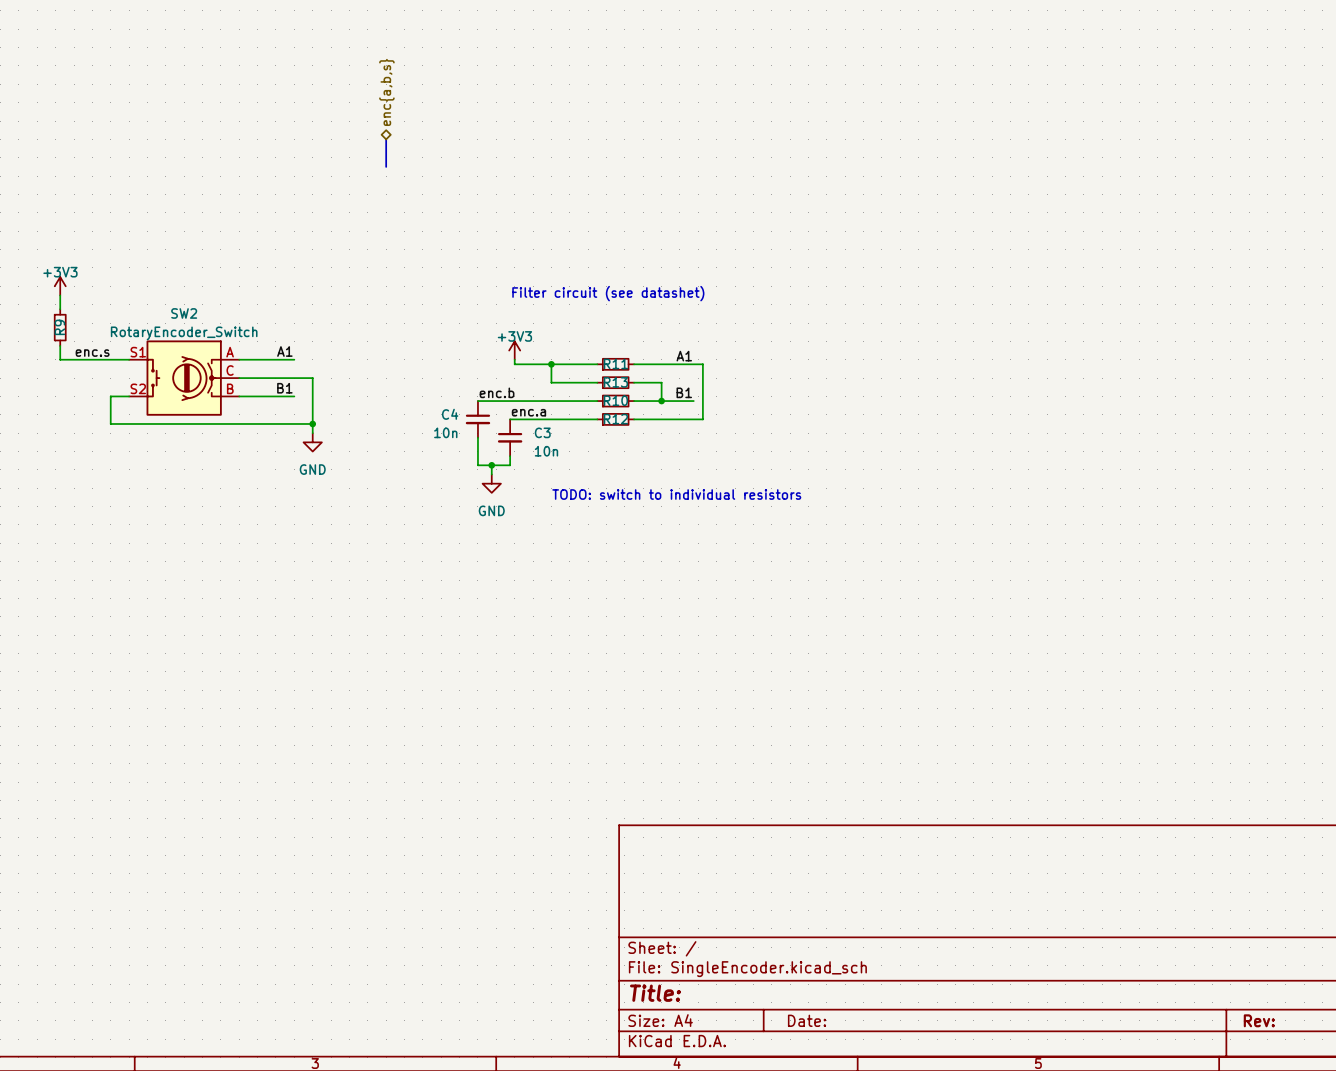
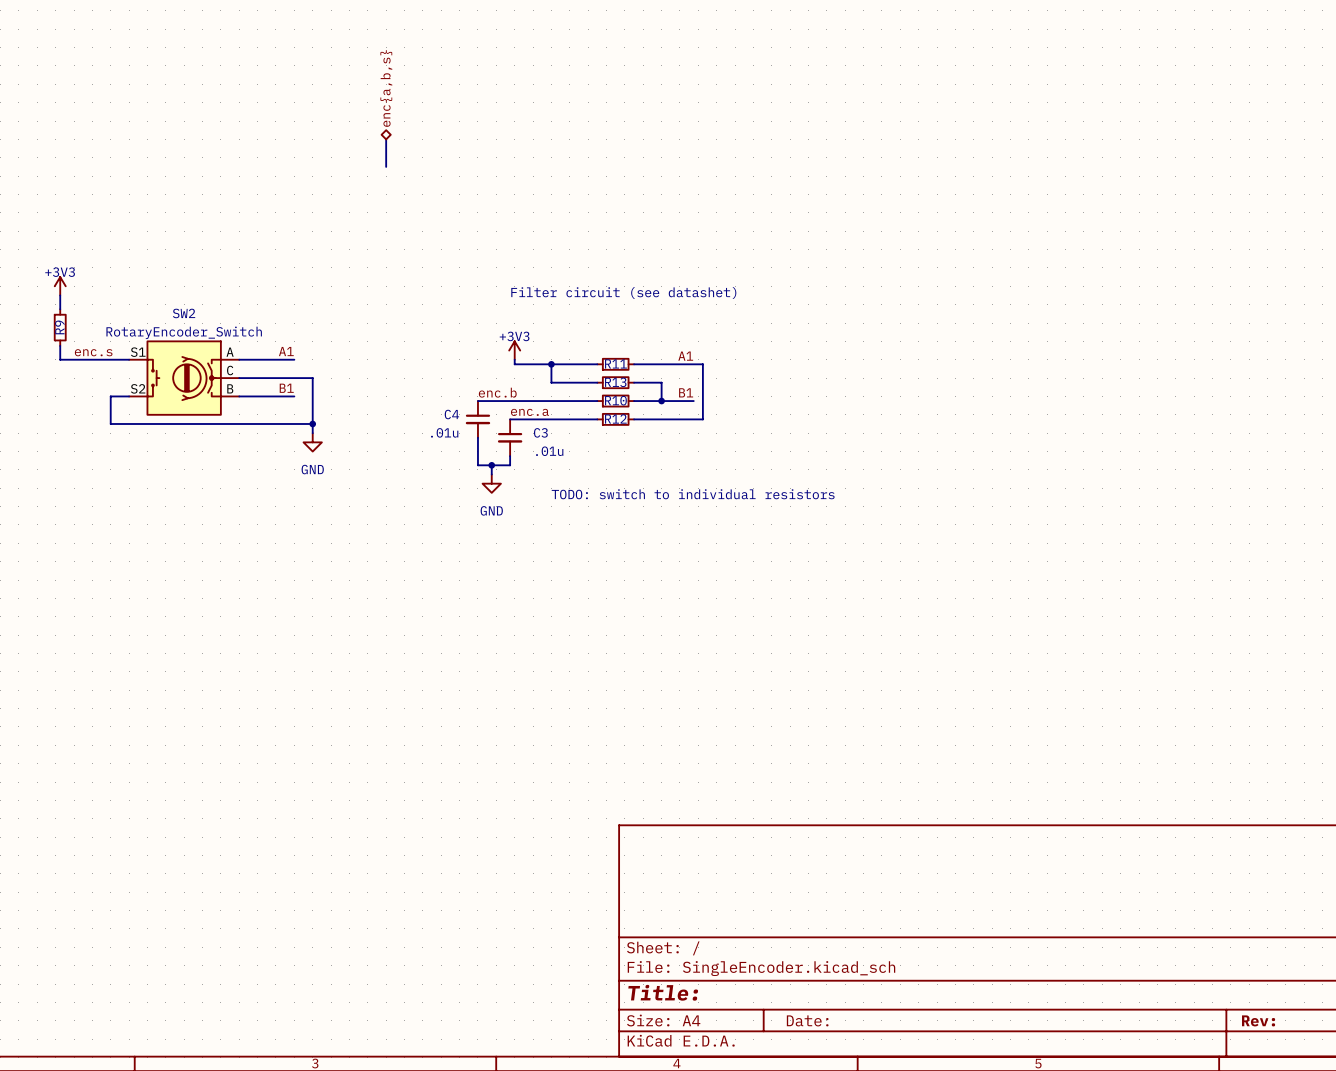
C4 value: 10n (445, 432) -> .01u (444, 432)
C3 value: 10n (546, 451) -> .01u (549, 451)

